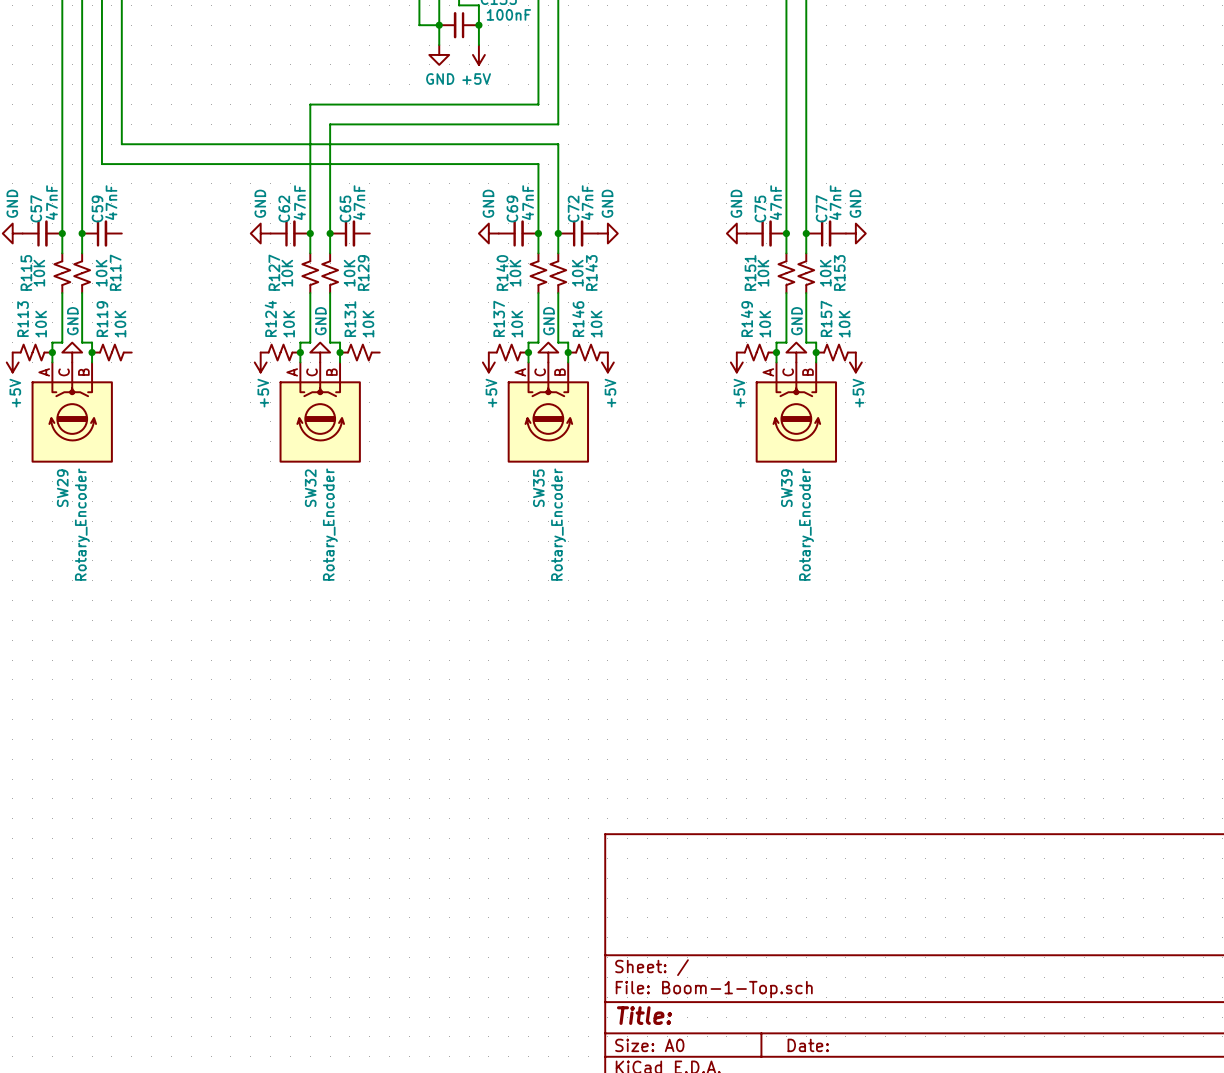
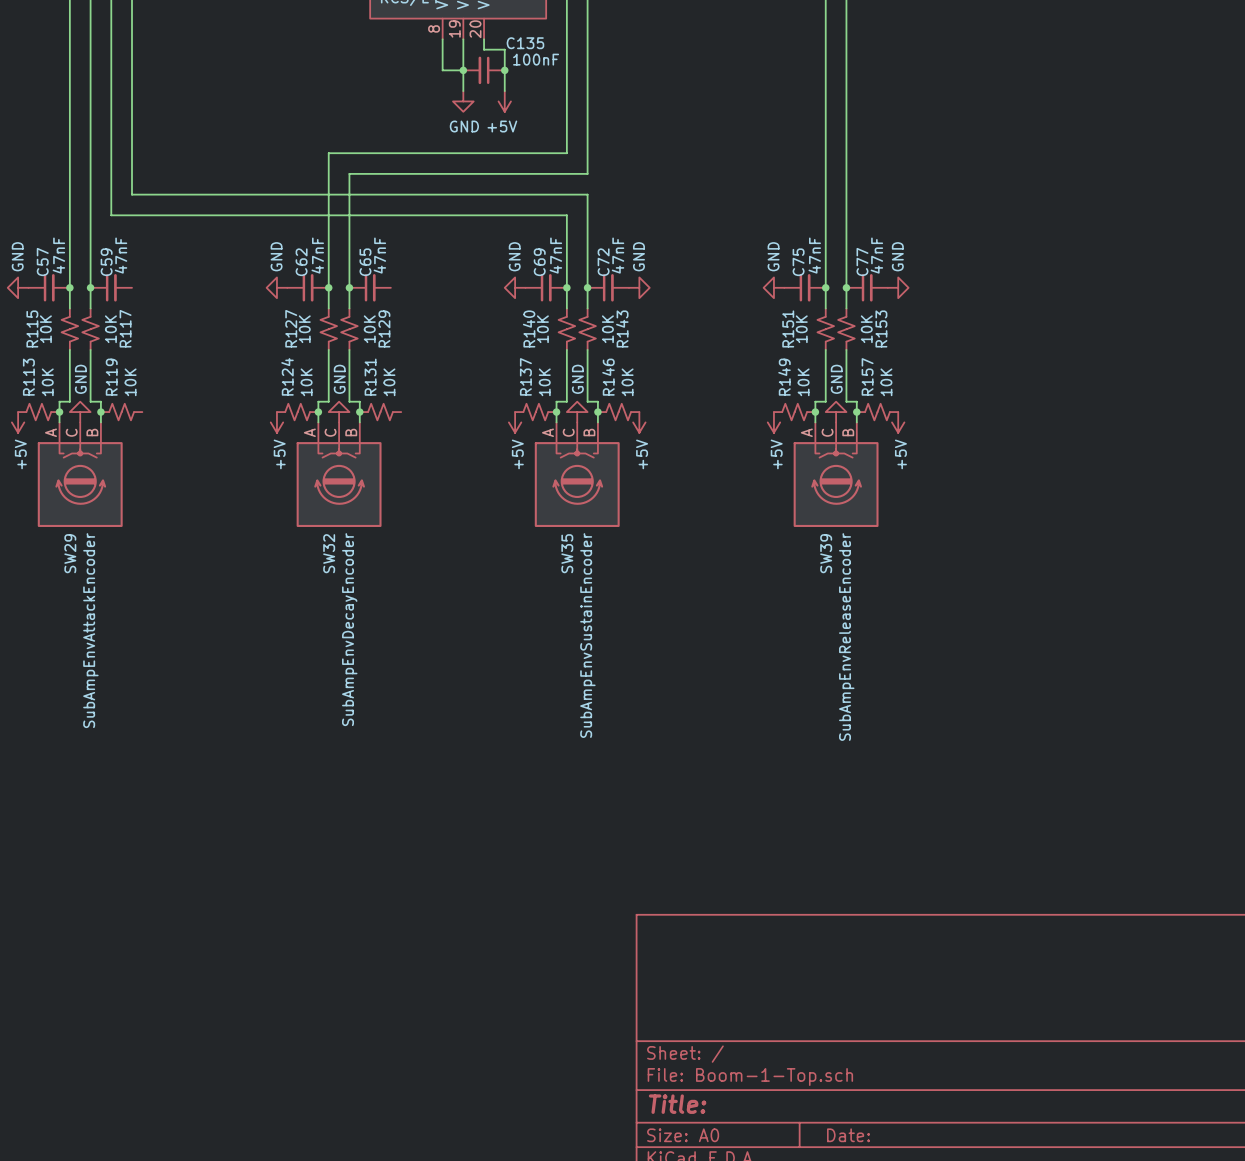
SW29 value: Rotary_Encoder (82, 524) -> SubAmpEnvAttackEncoder (90, 630)
SW32 value: Rotary_Encoder (330, 524) -> SubAmpEnvDecayEncoder (349, 629)
SW35 value: Rotary_Encoder (558, 524) -> SubAmpEnvSustainEncoder (587, 635)
SW39 value: Rotary_Encoder (806, 524) -> SubAmpEnvReleaseEncoder (846, 637)

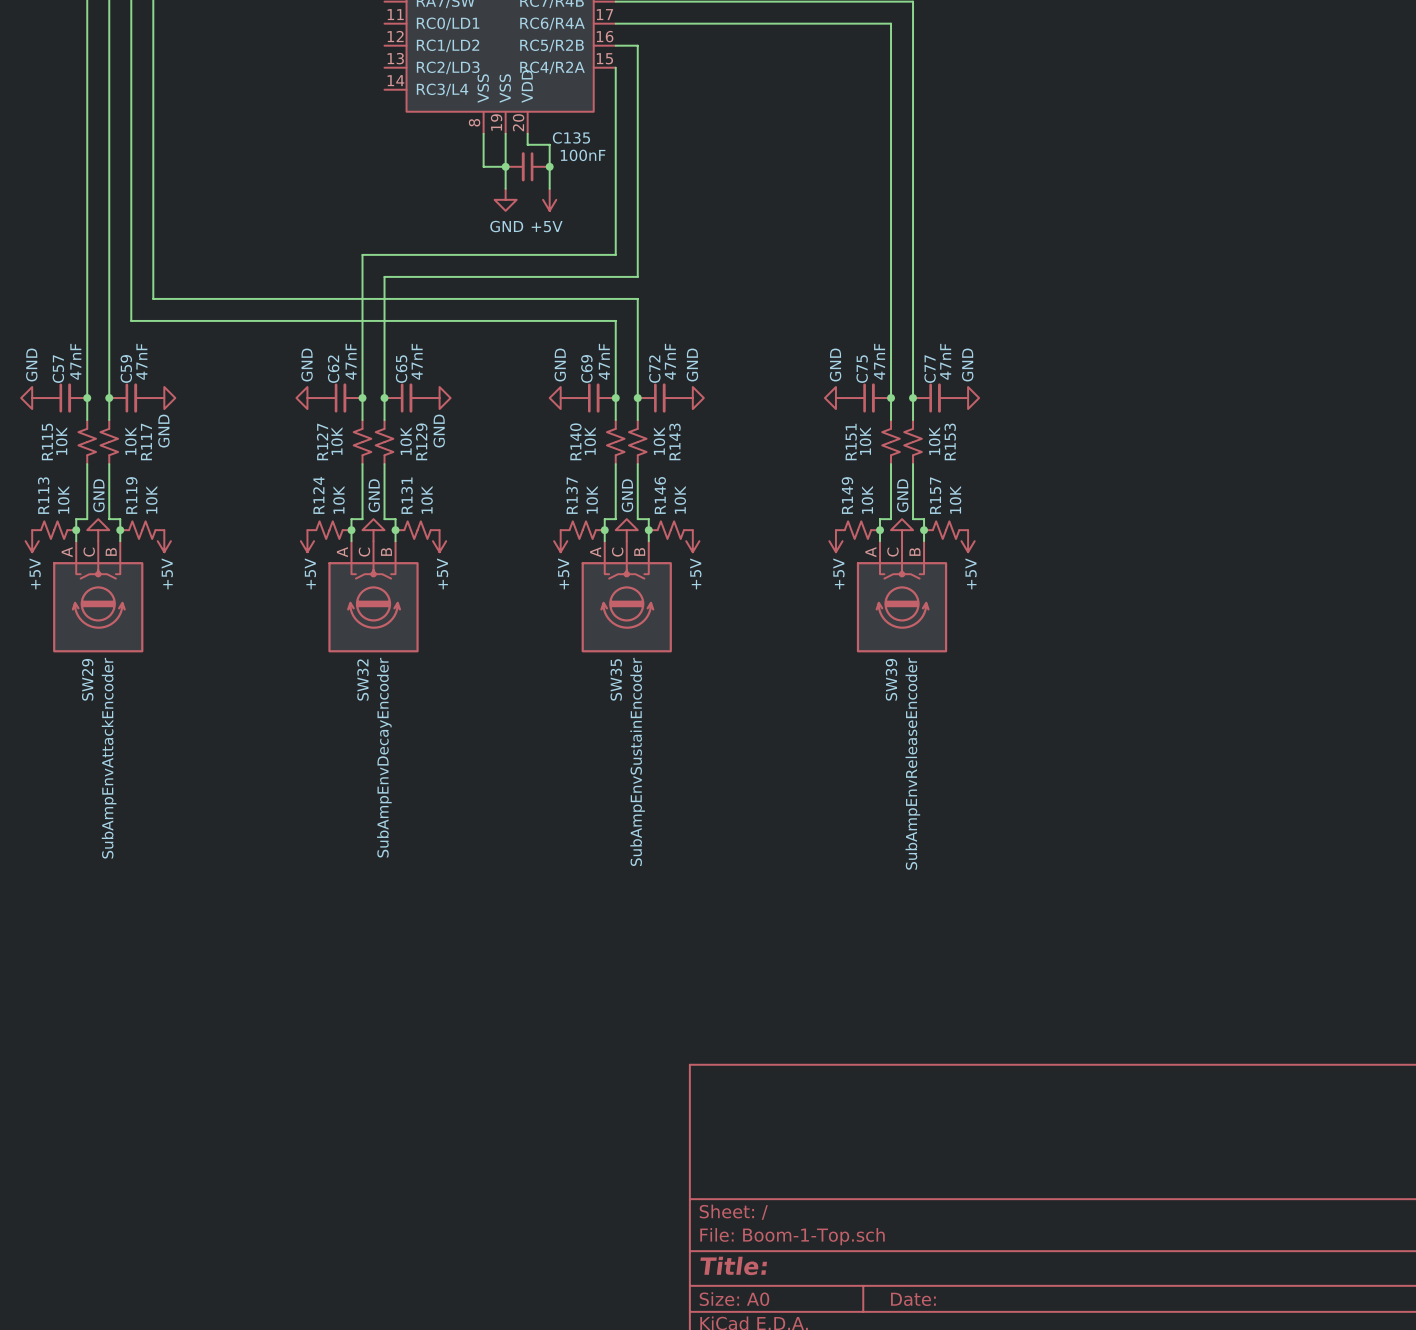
power symbol: none -> GND (164, 398)
power symbol: none -> GND (439, 398)
power symbol: none -> +5V (164, 541)
power symbol: none -> +5V (439, 541)

